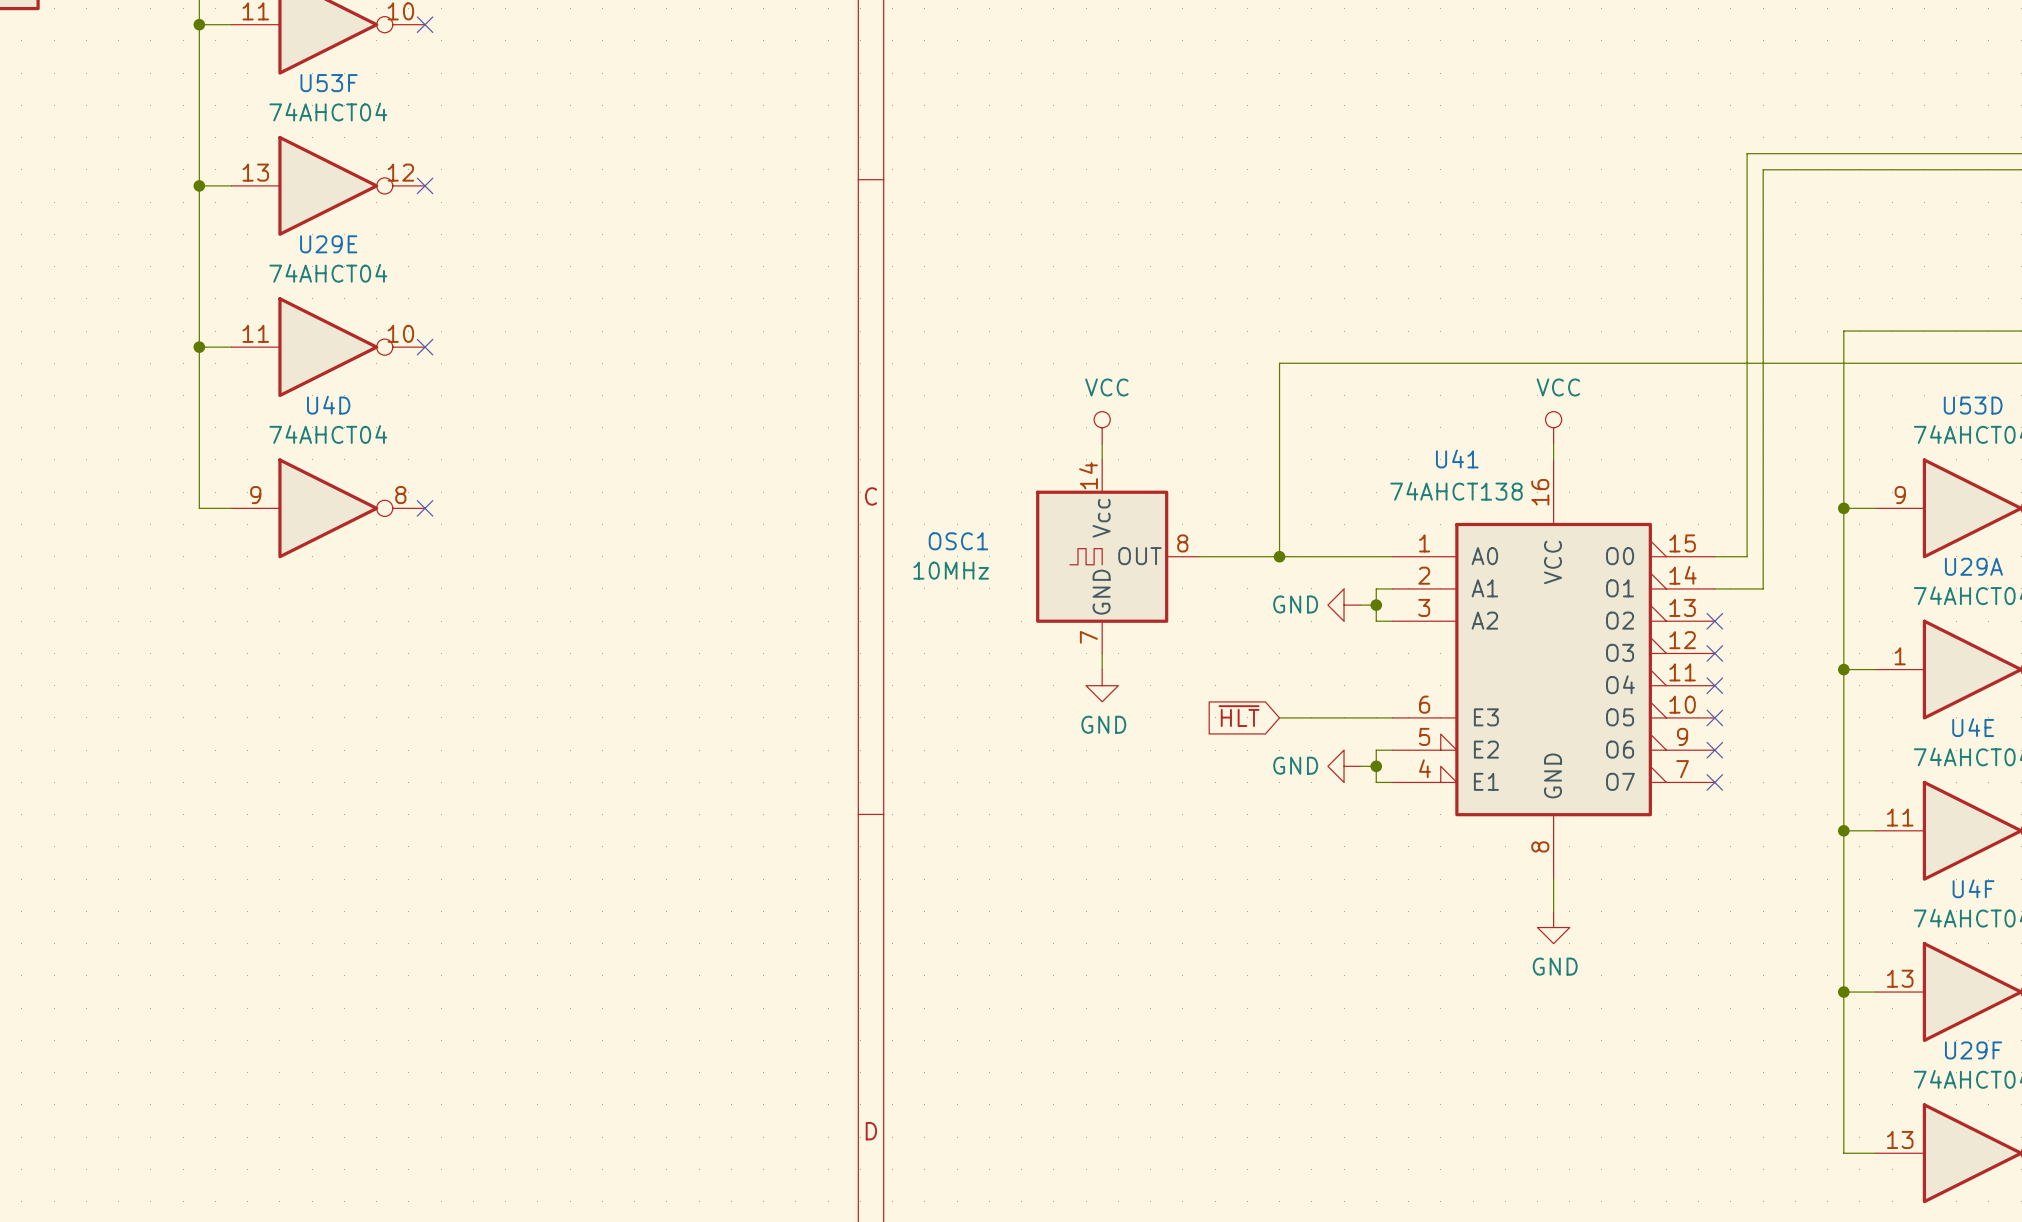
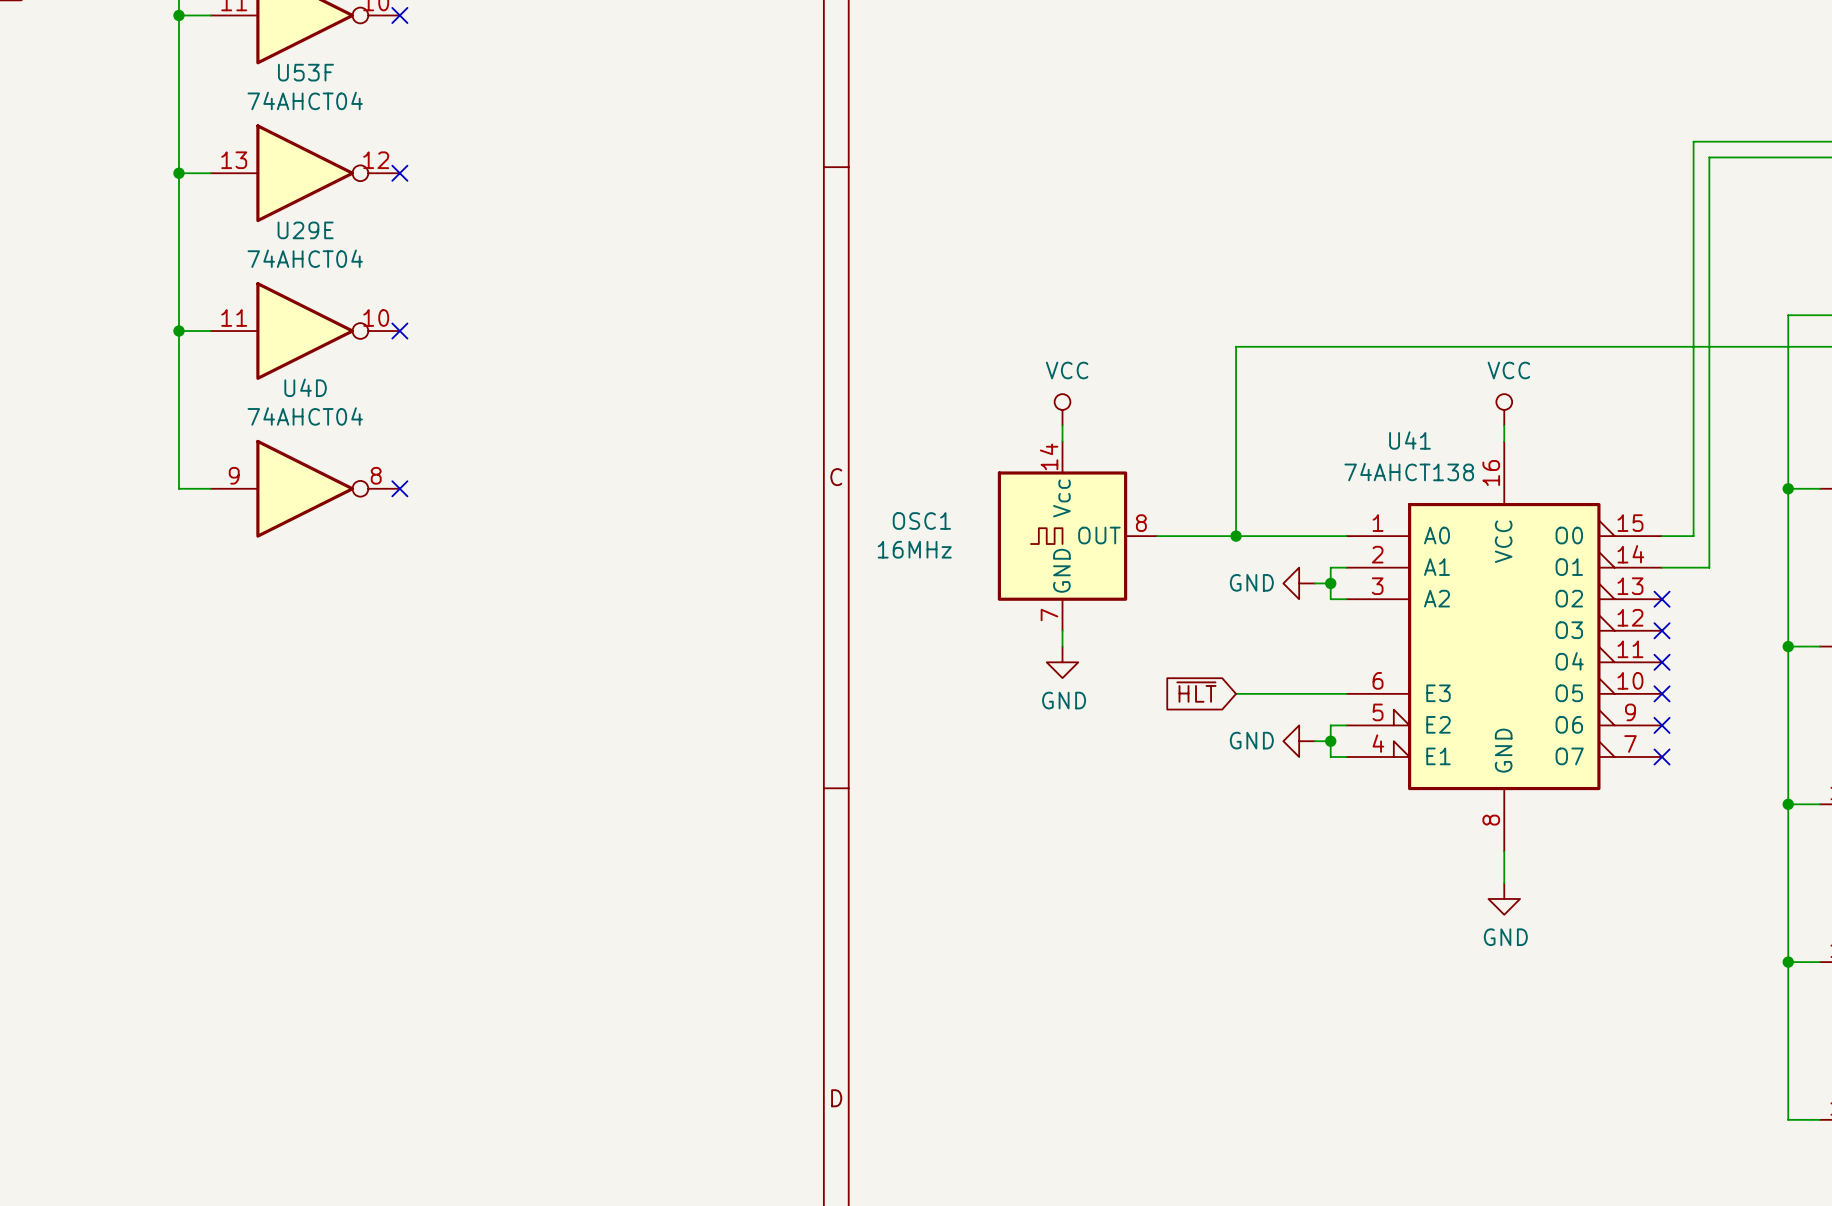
OSC1 value: 10MHz (951, 570) -> 16MHz (914, 549)

